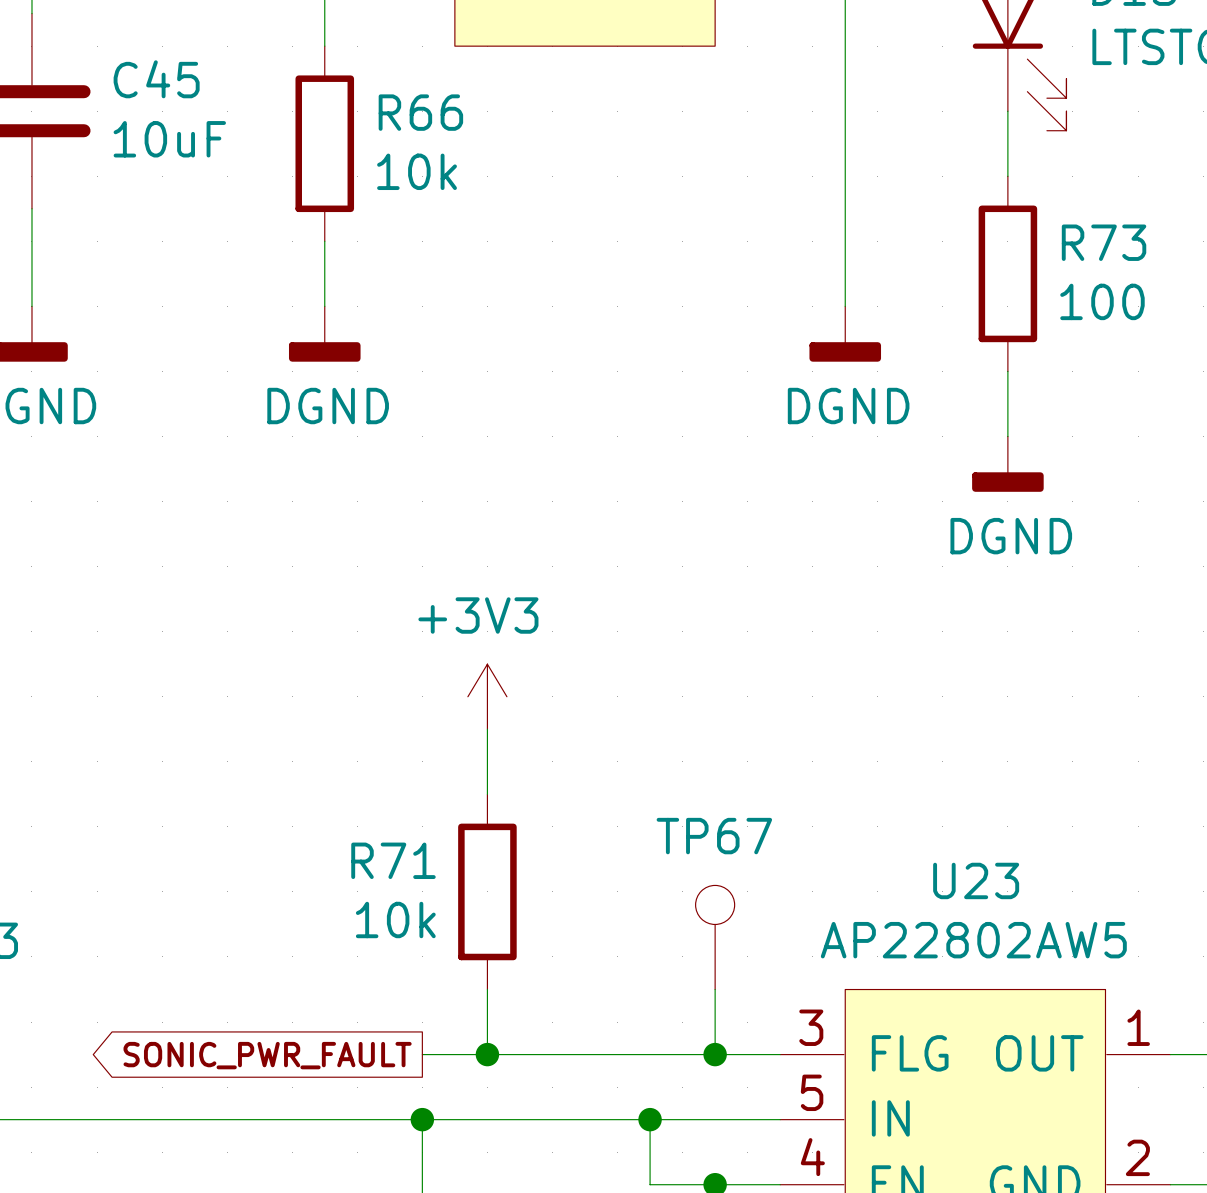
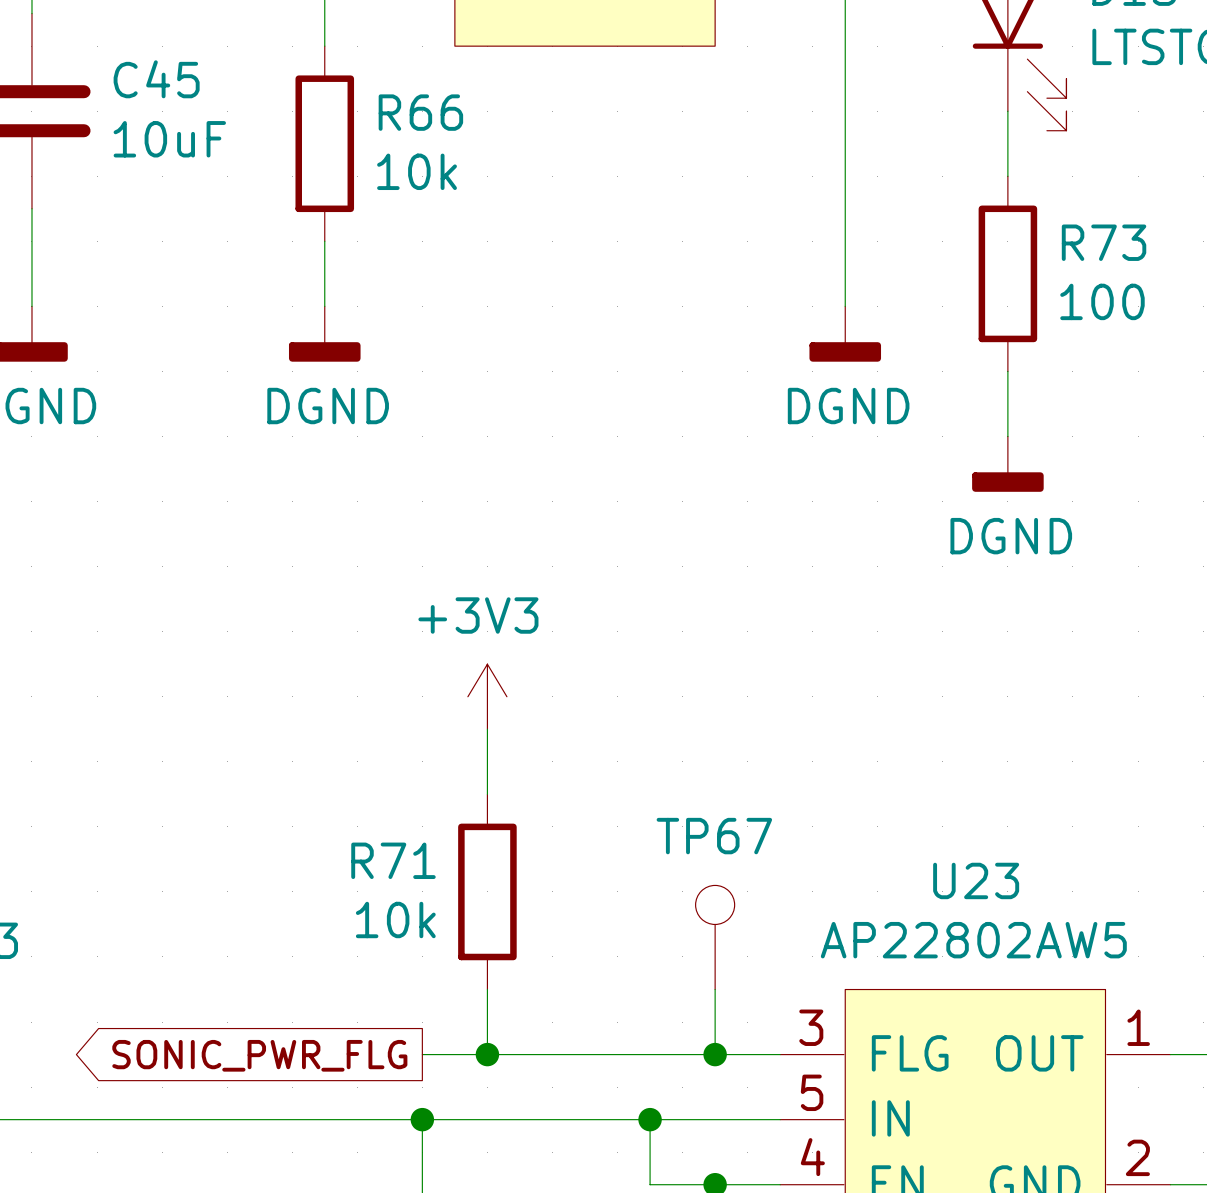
global label: SONIC_PWR_FAULT (267, 1055) -> SONIC_PWR_FLG (259, 1055)

